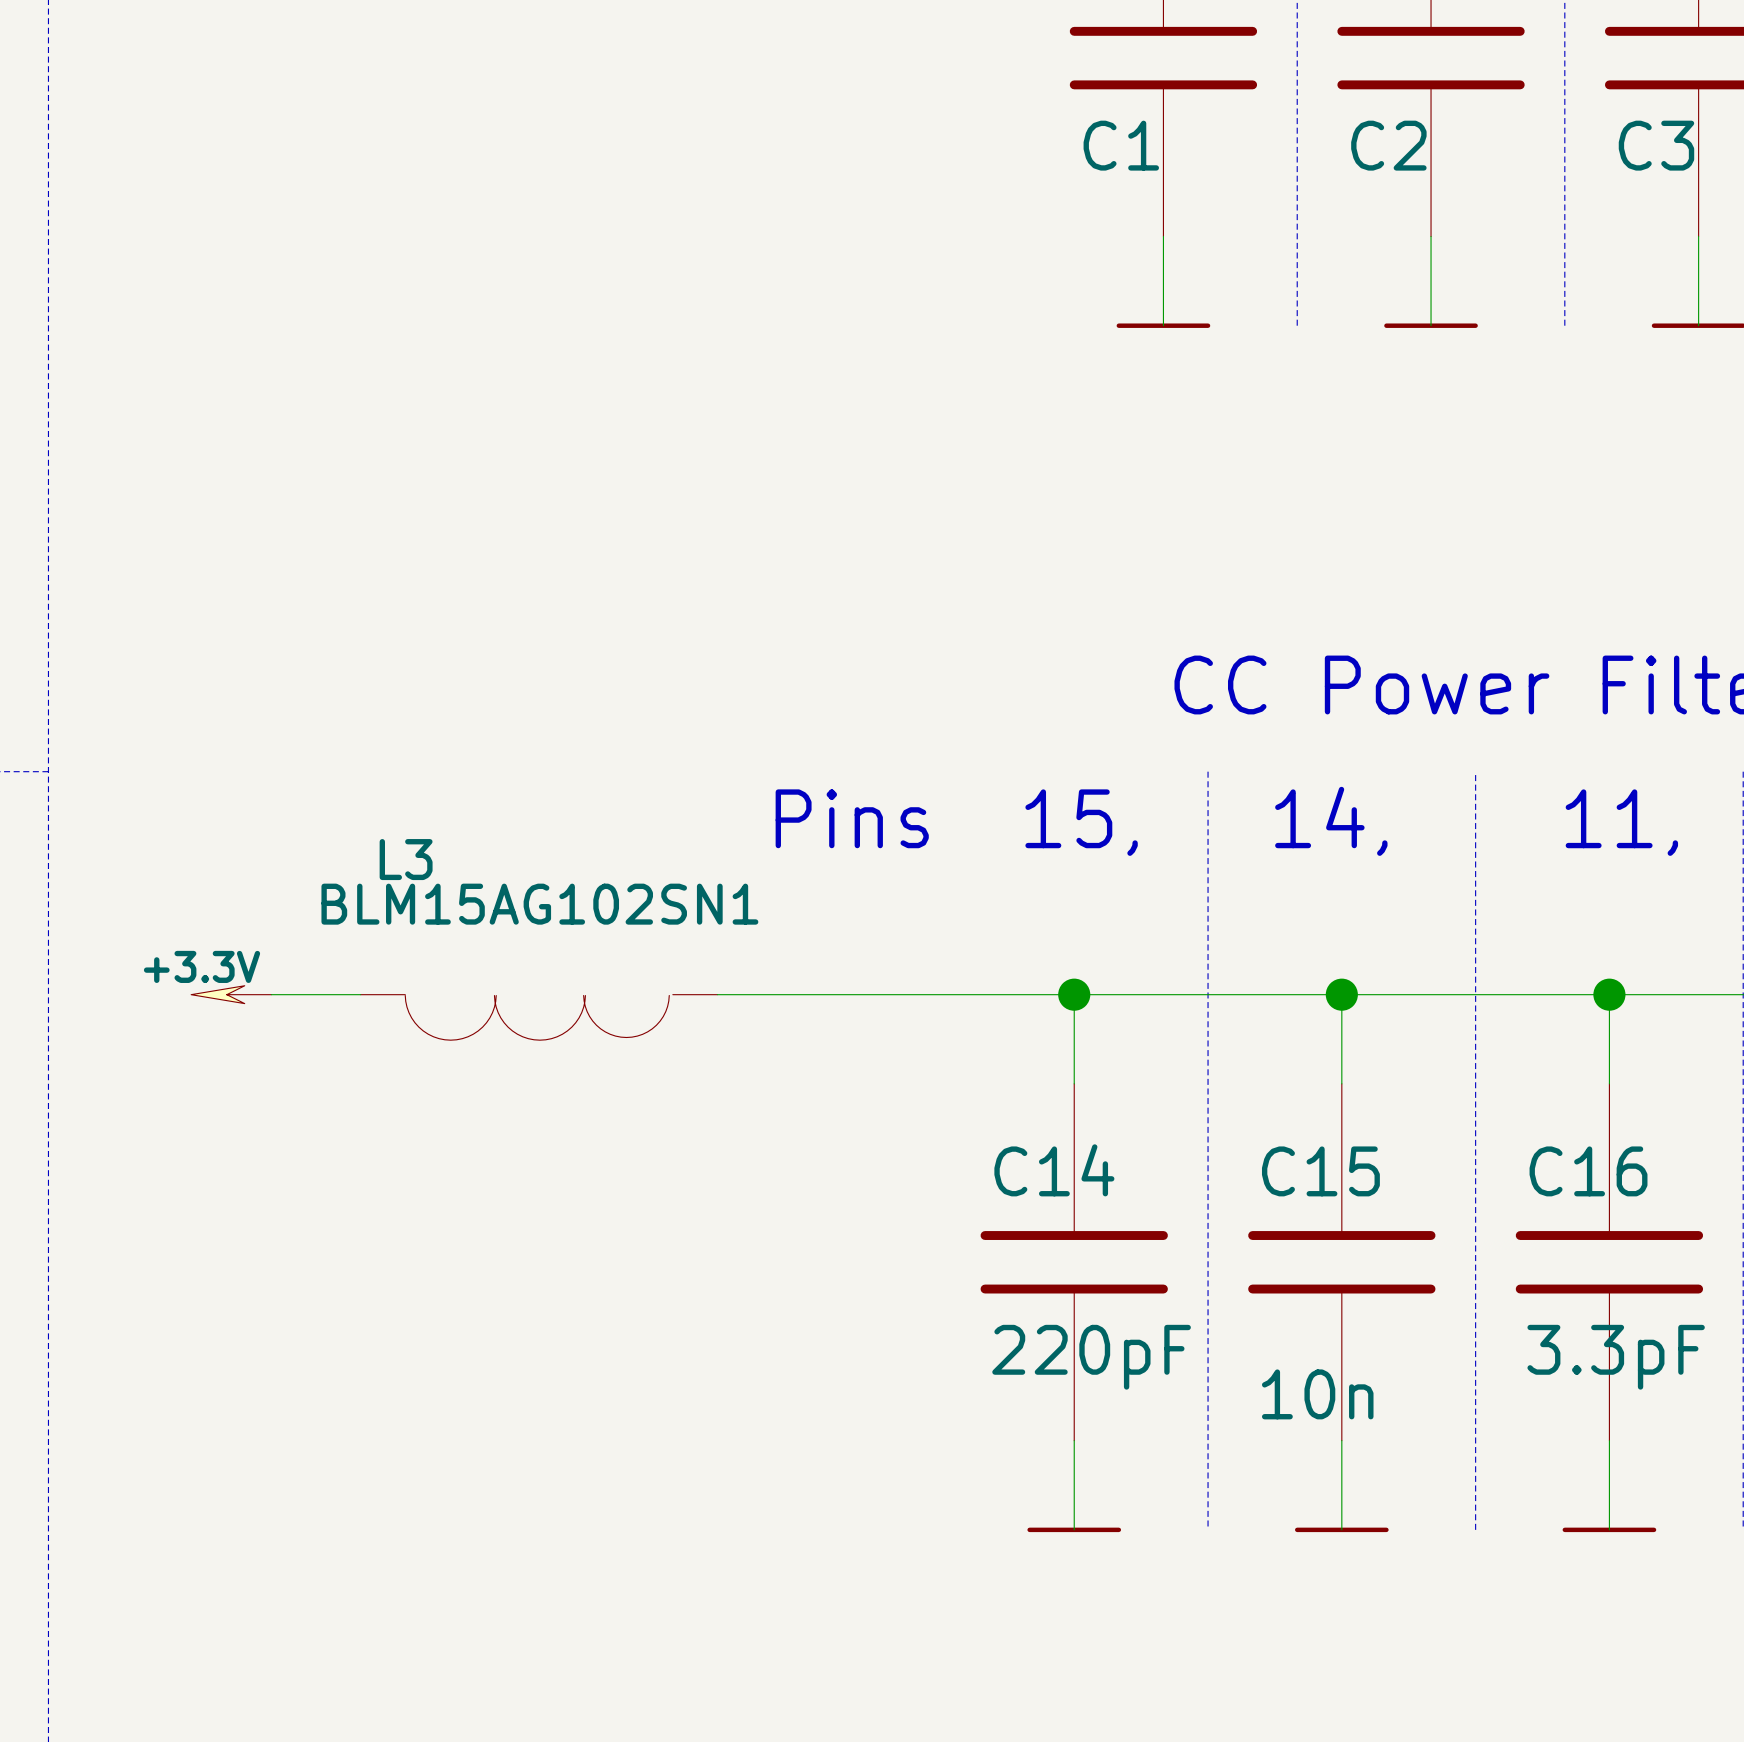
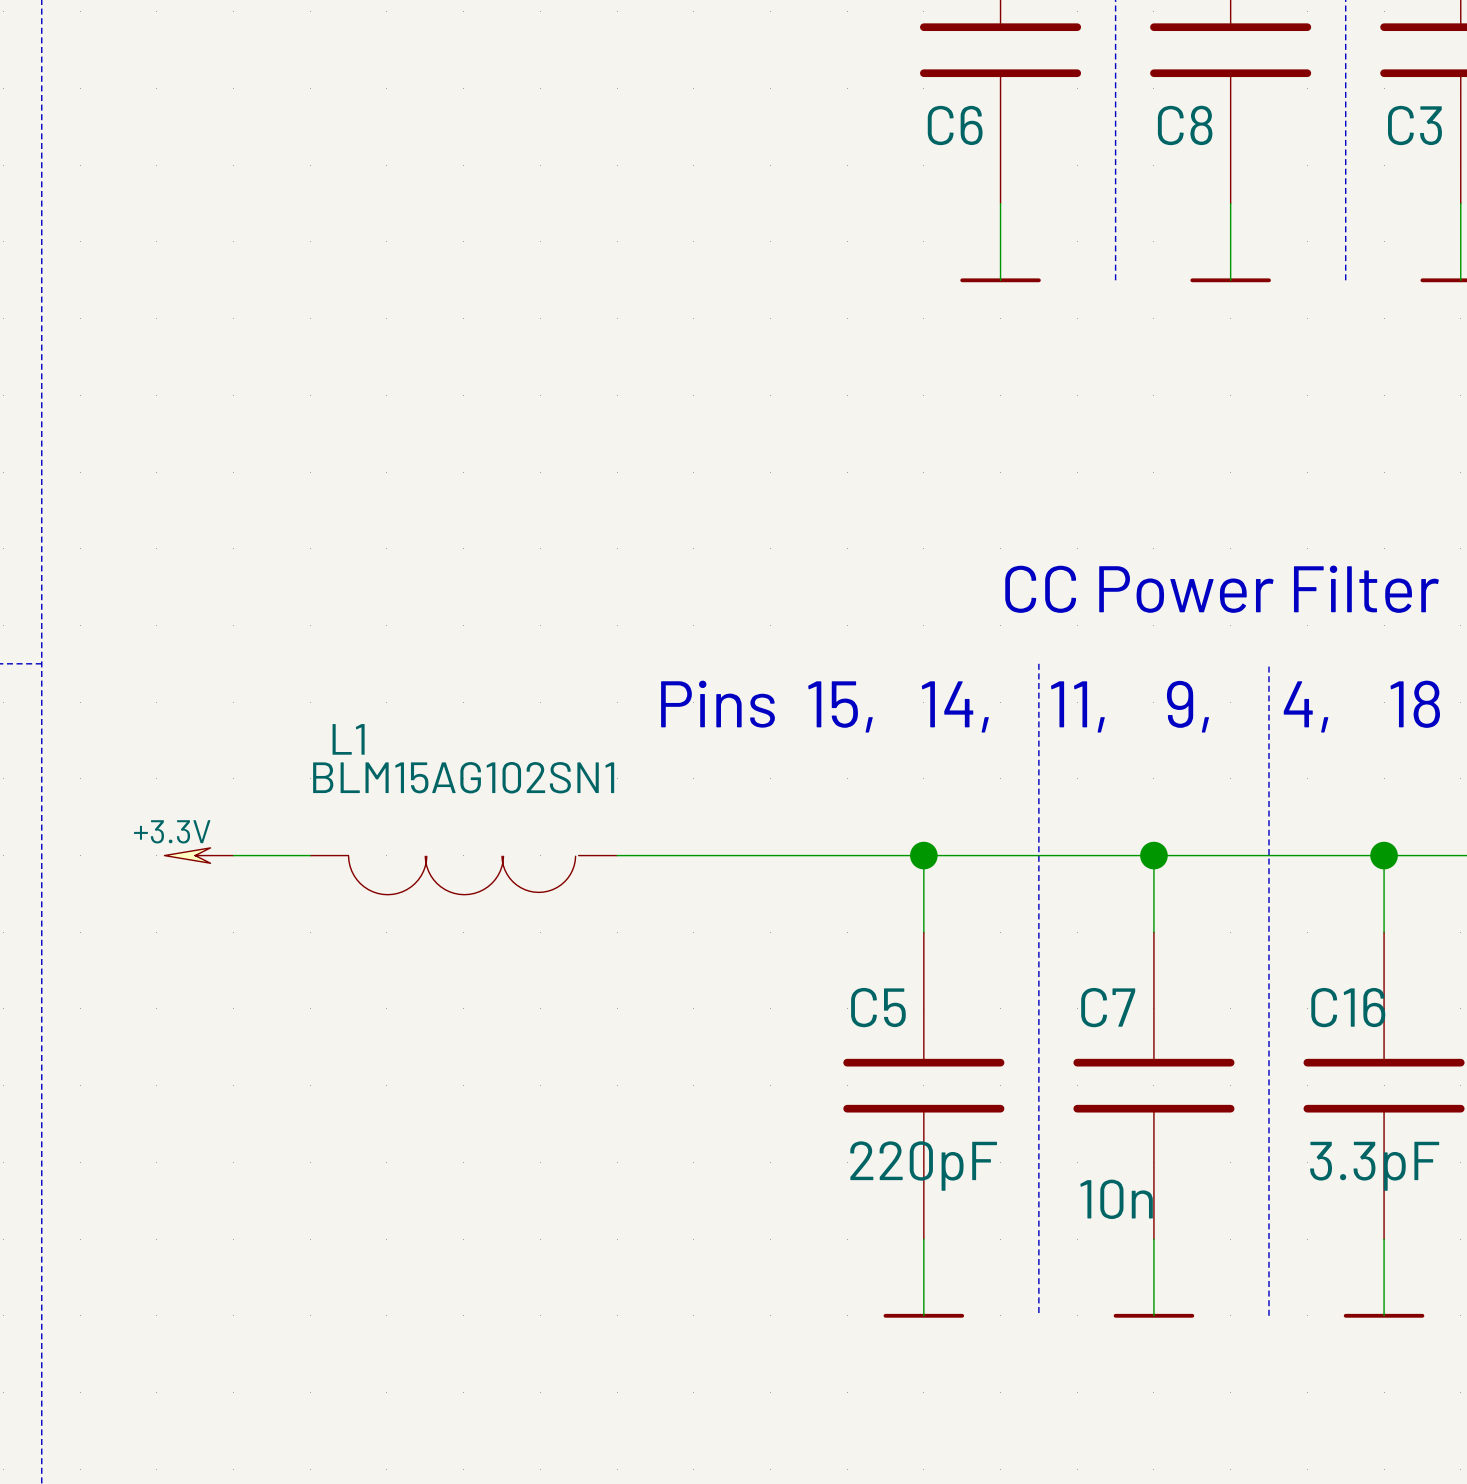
C1 name: C1 (1121, 145) -> C6 (955, 125)
C2 name: C2 (1388, 145) -> C8 (1185, 125)
L3 name: L3 (406, 859) -> L1 (348, 739)
C14 name: C14 (1054, 1170) -> C5 (878, 1007)
C15 name: C15 (1320, 1171) -> C7 (1108, 1007)

